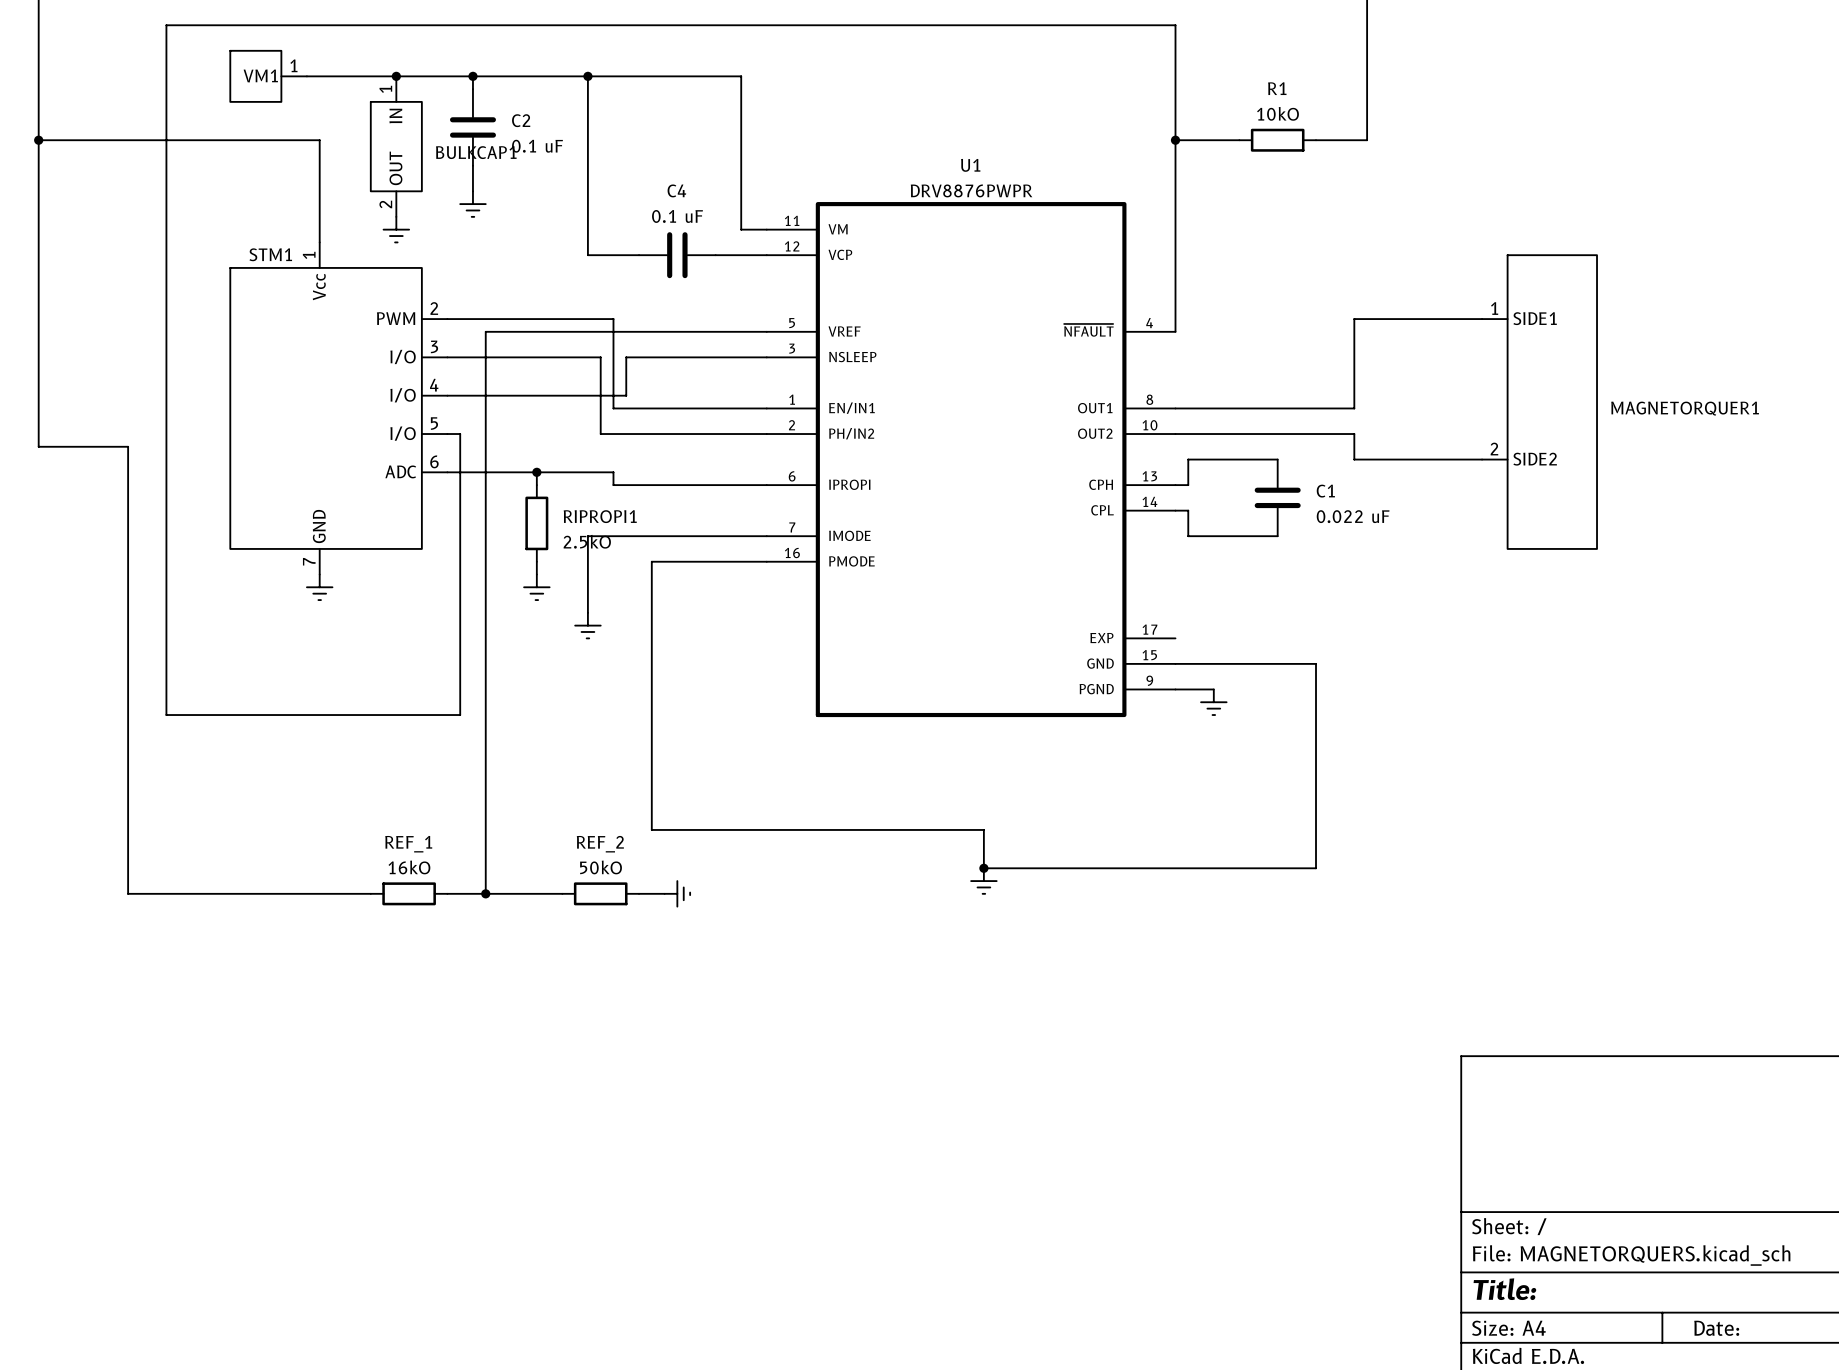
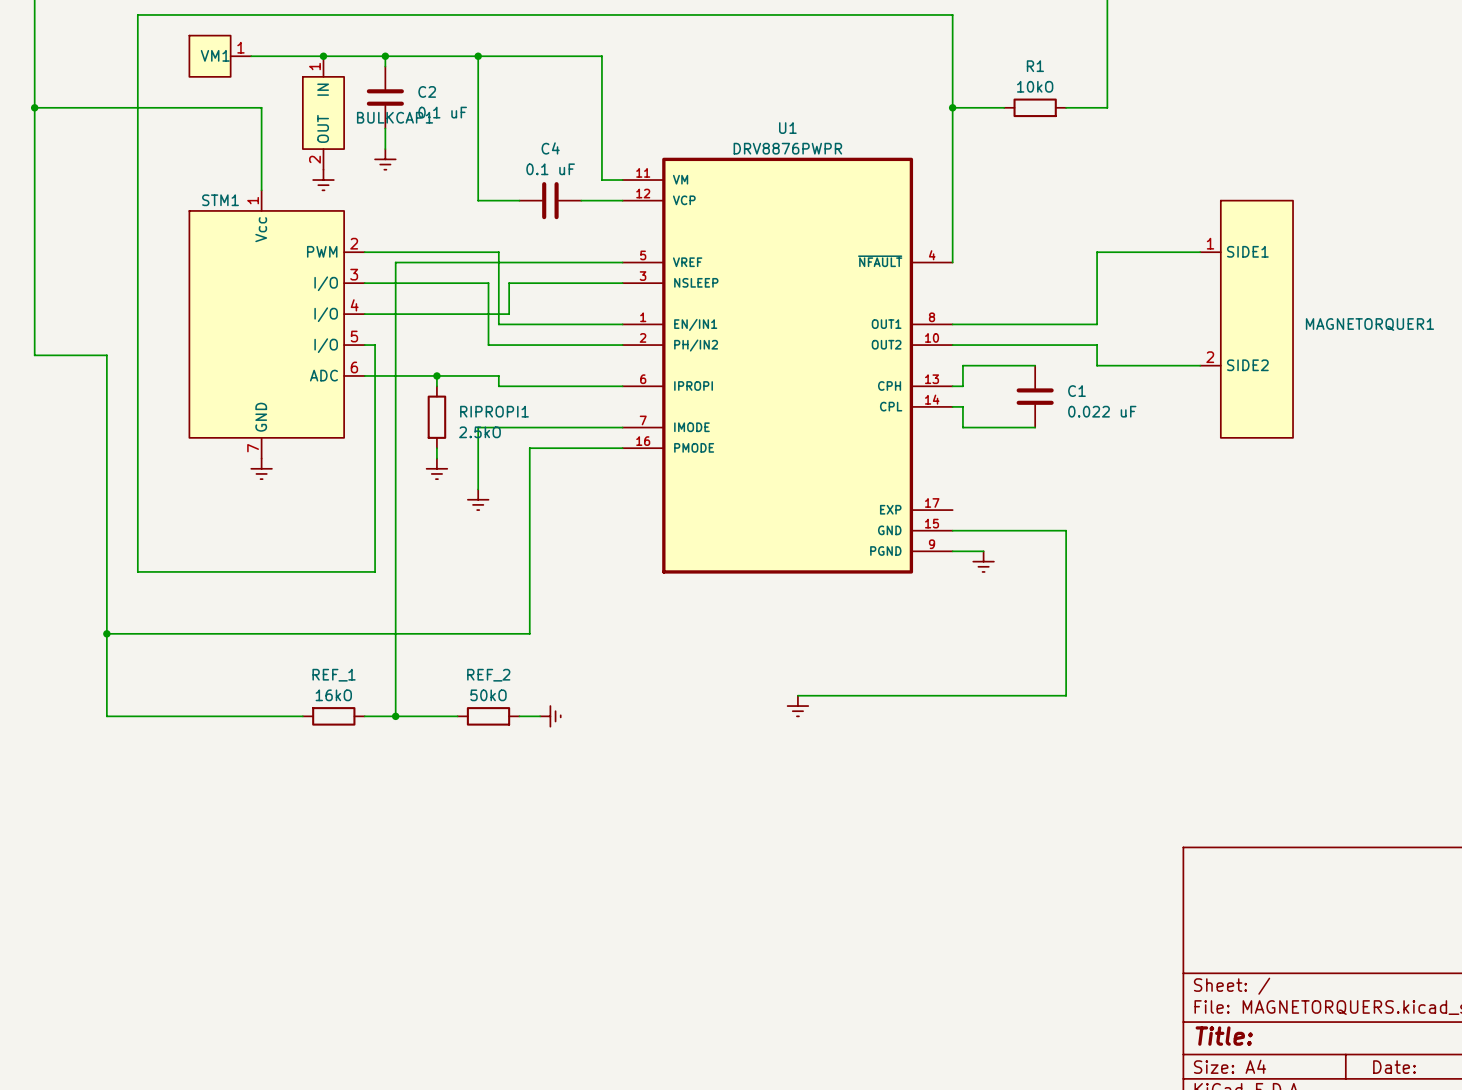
junction: none -> (106, 633)
wire: (651, 791) (651, 829) (983, 829) (983, 868) -> (529, 633) (106, 633)
junction: (983, 868) -> none

